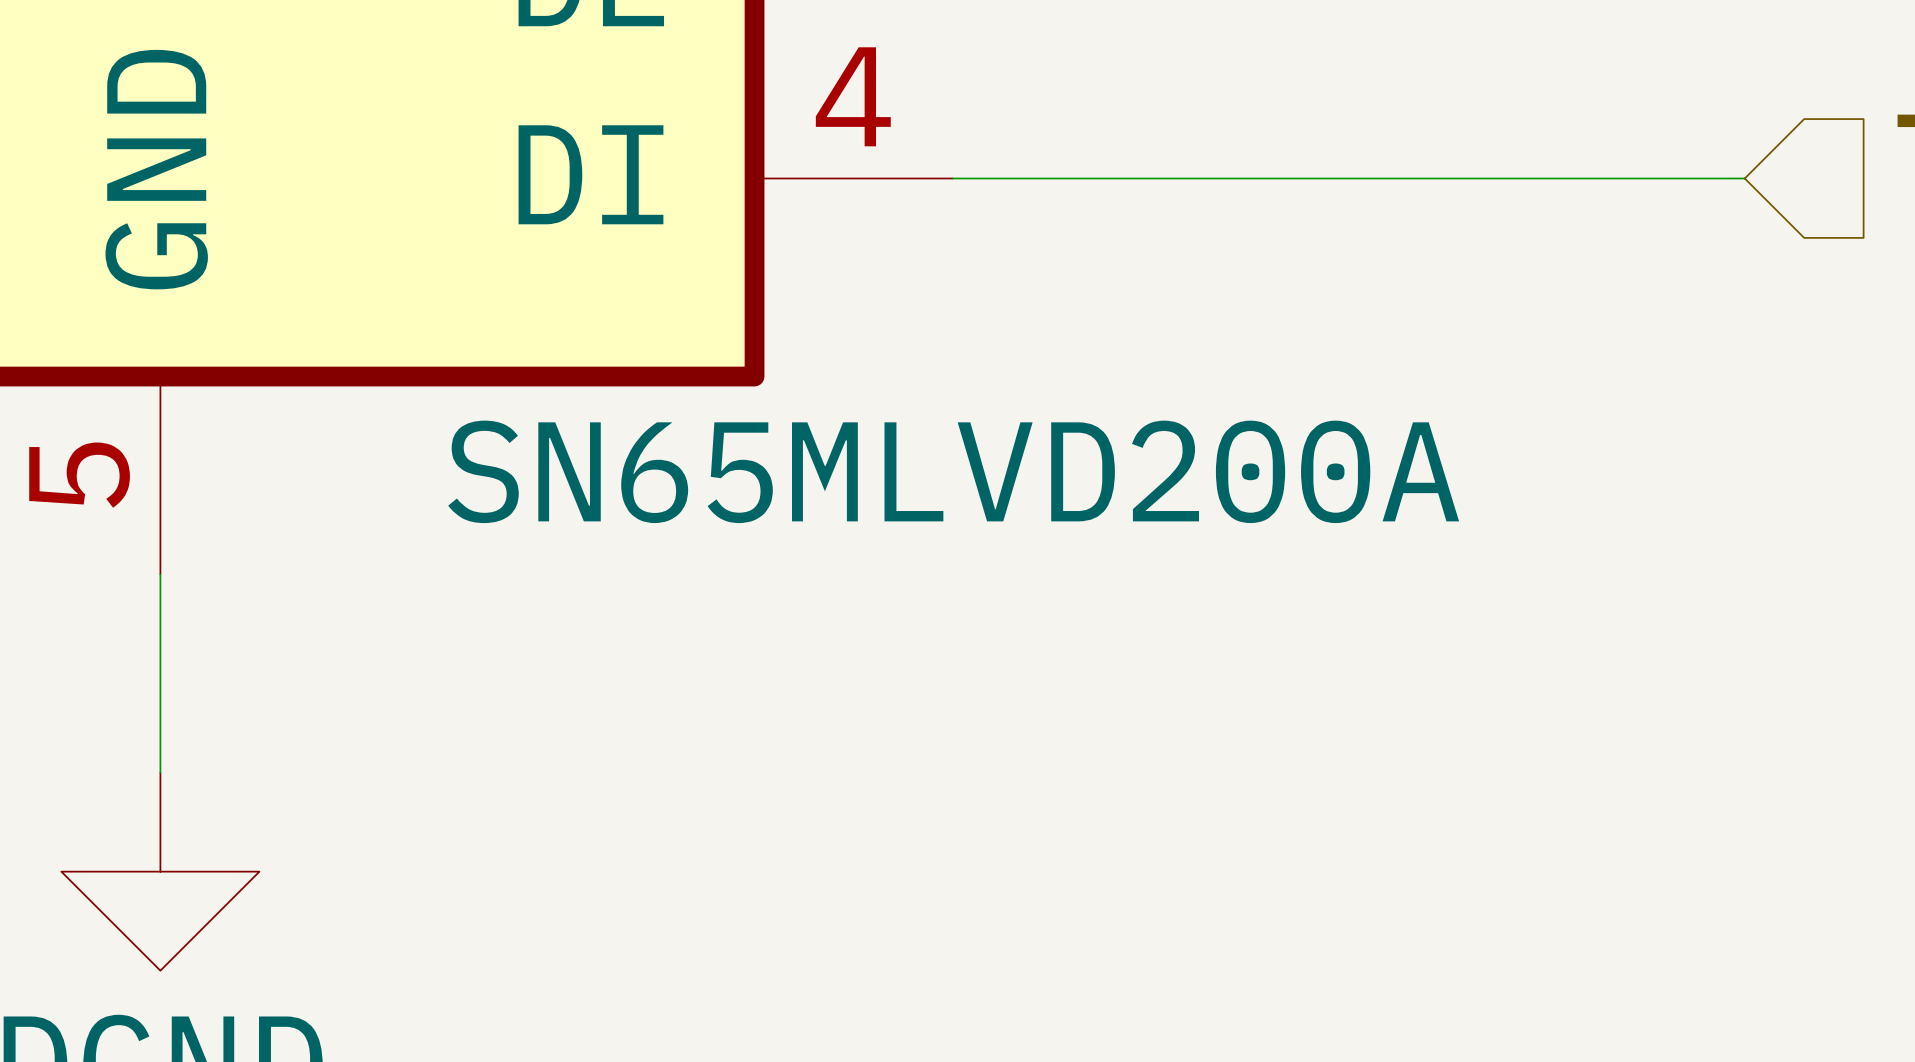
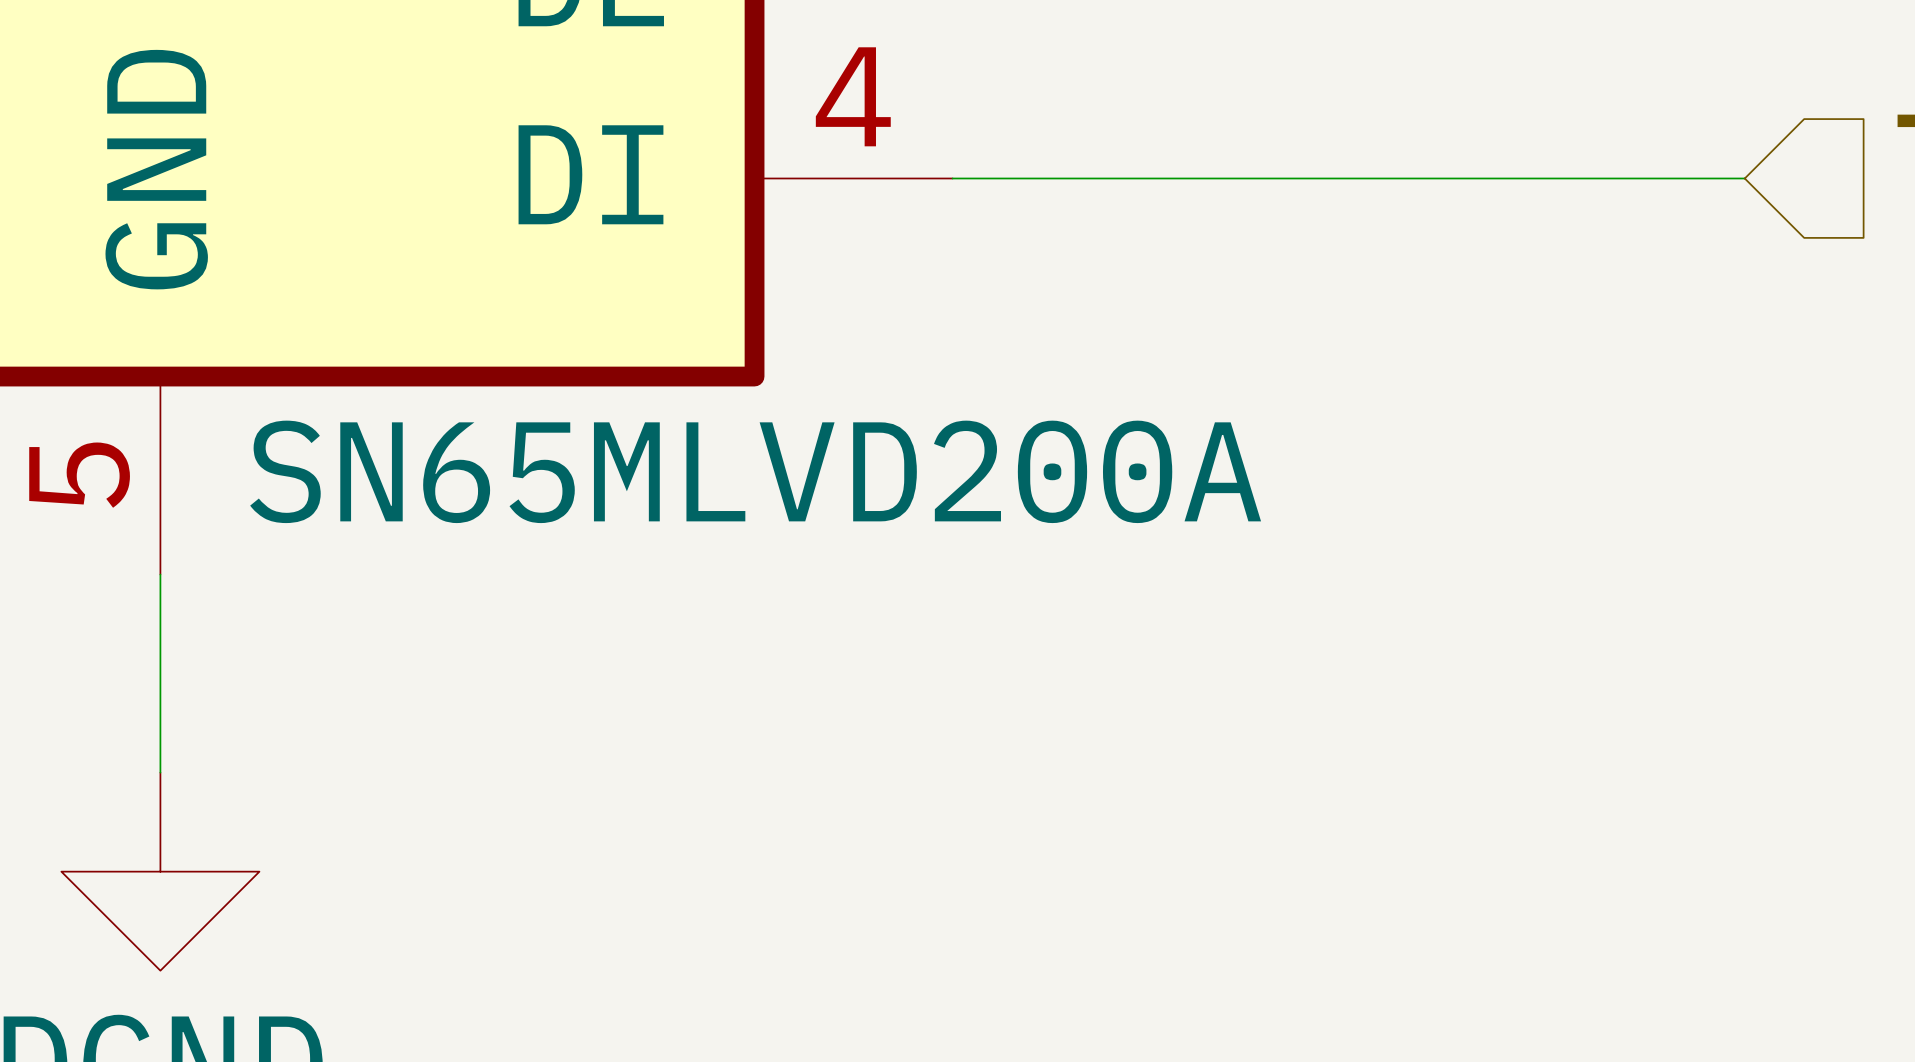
part value position: SN65MLVD200A (953, 471) -> SN65MLVD200A (755, 471)

